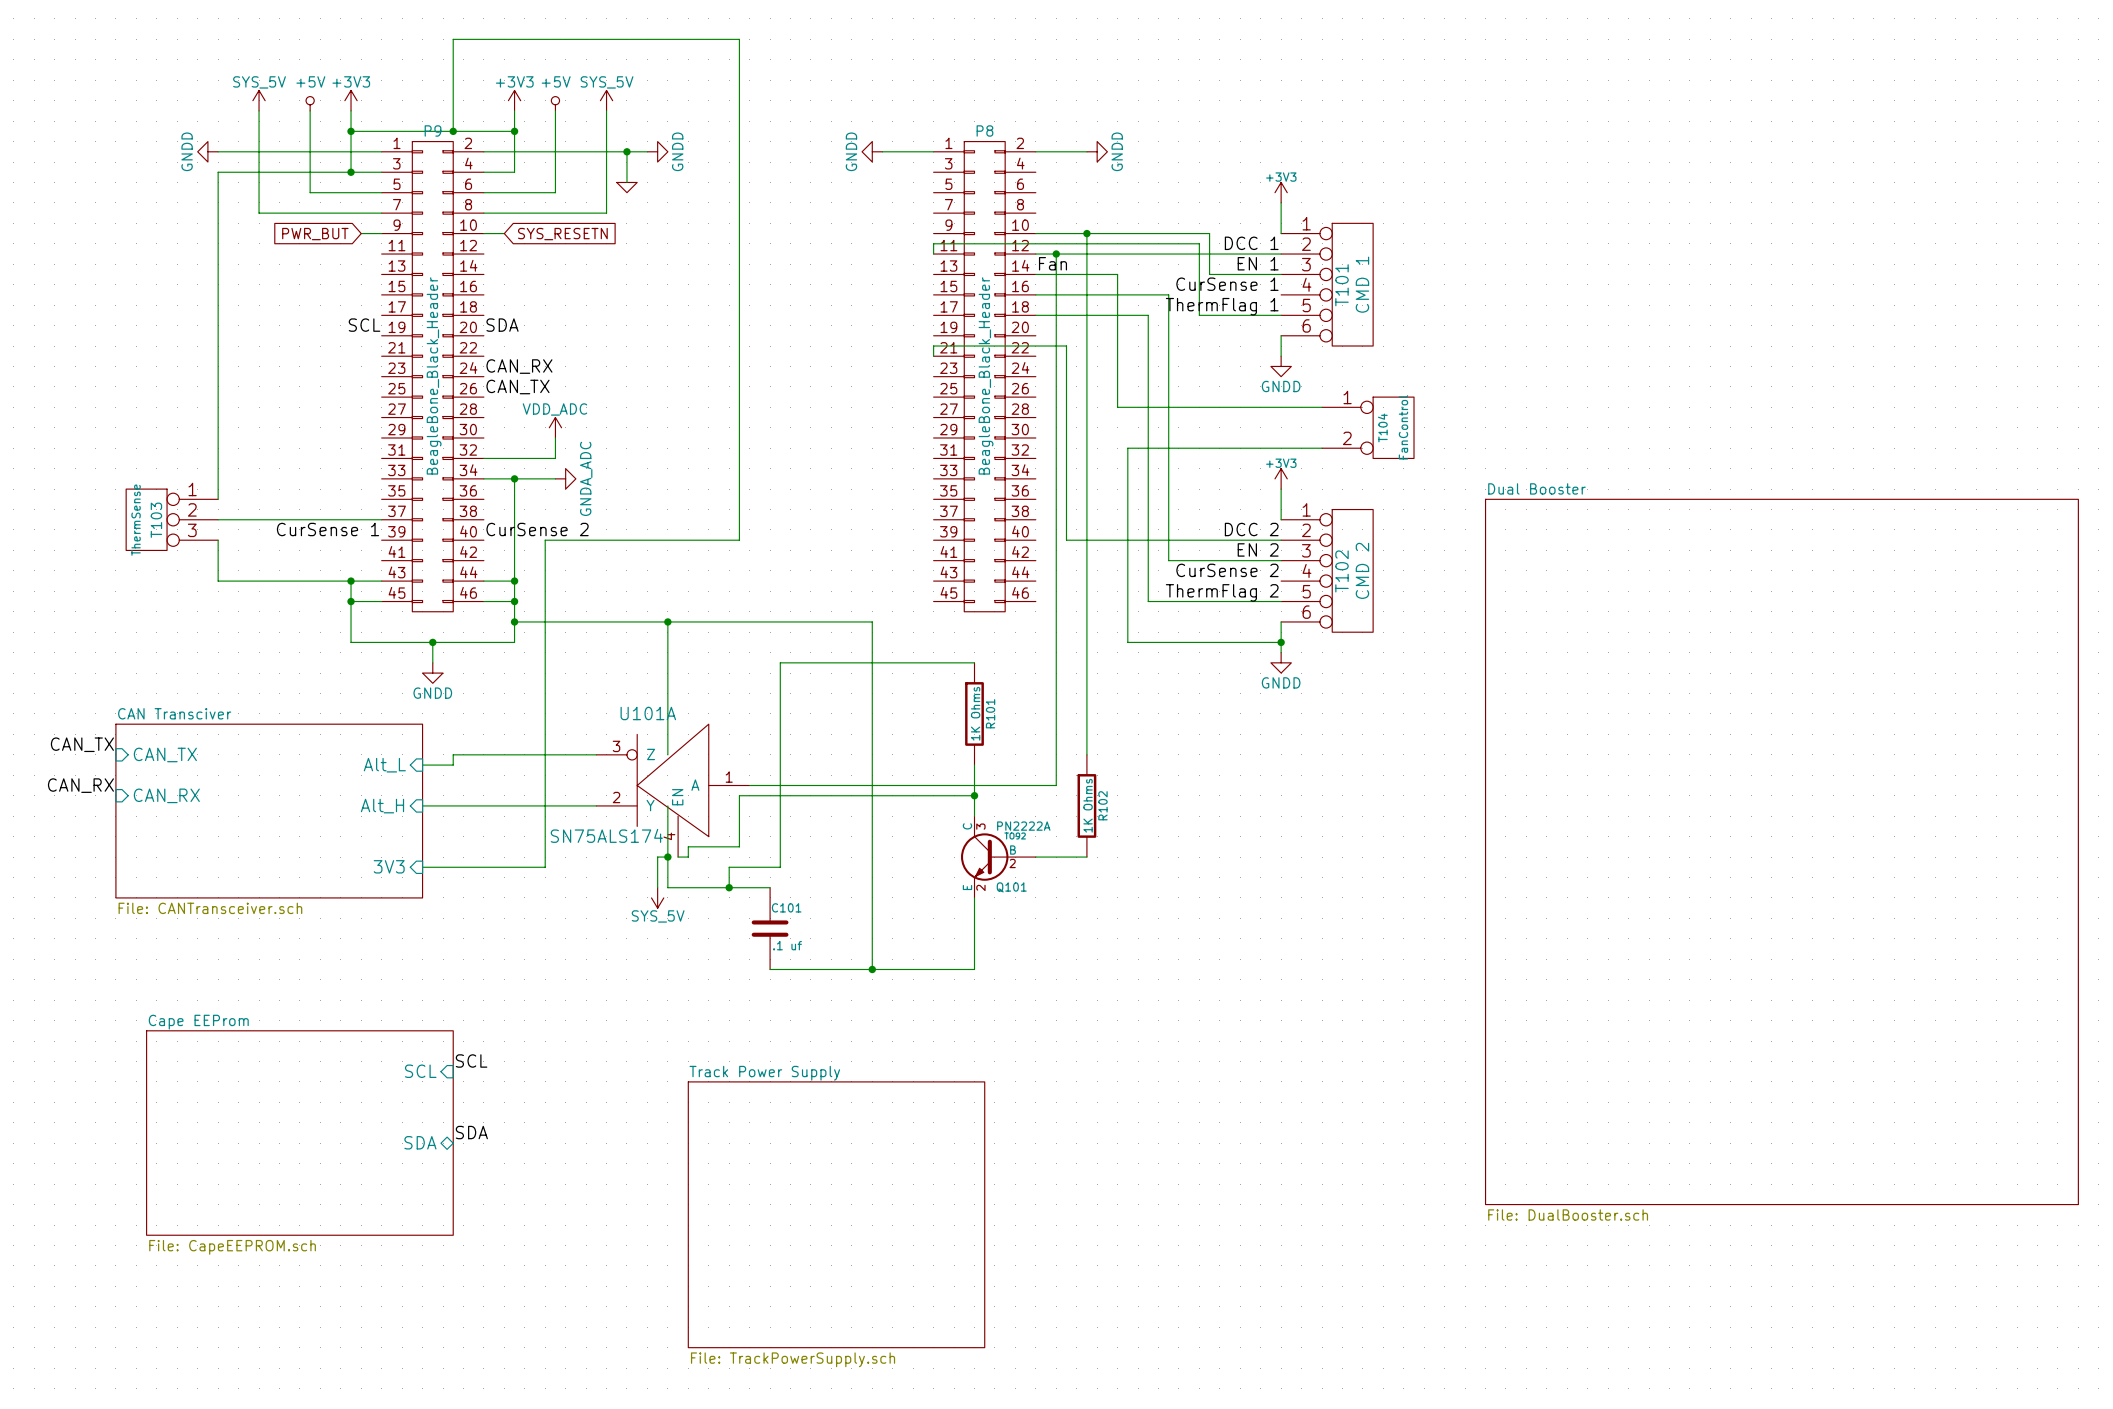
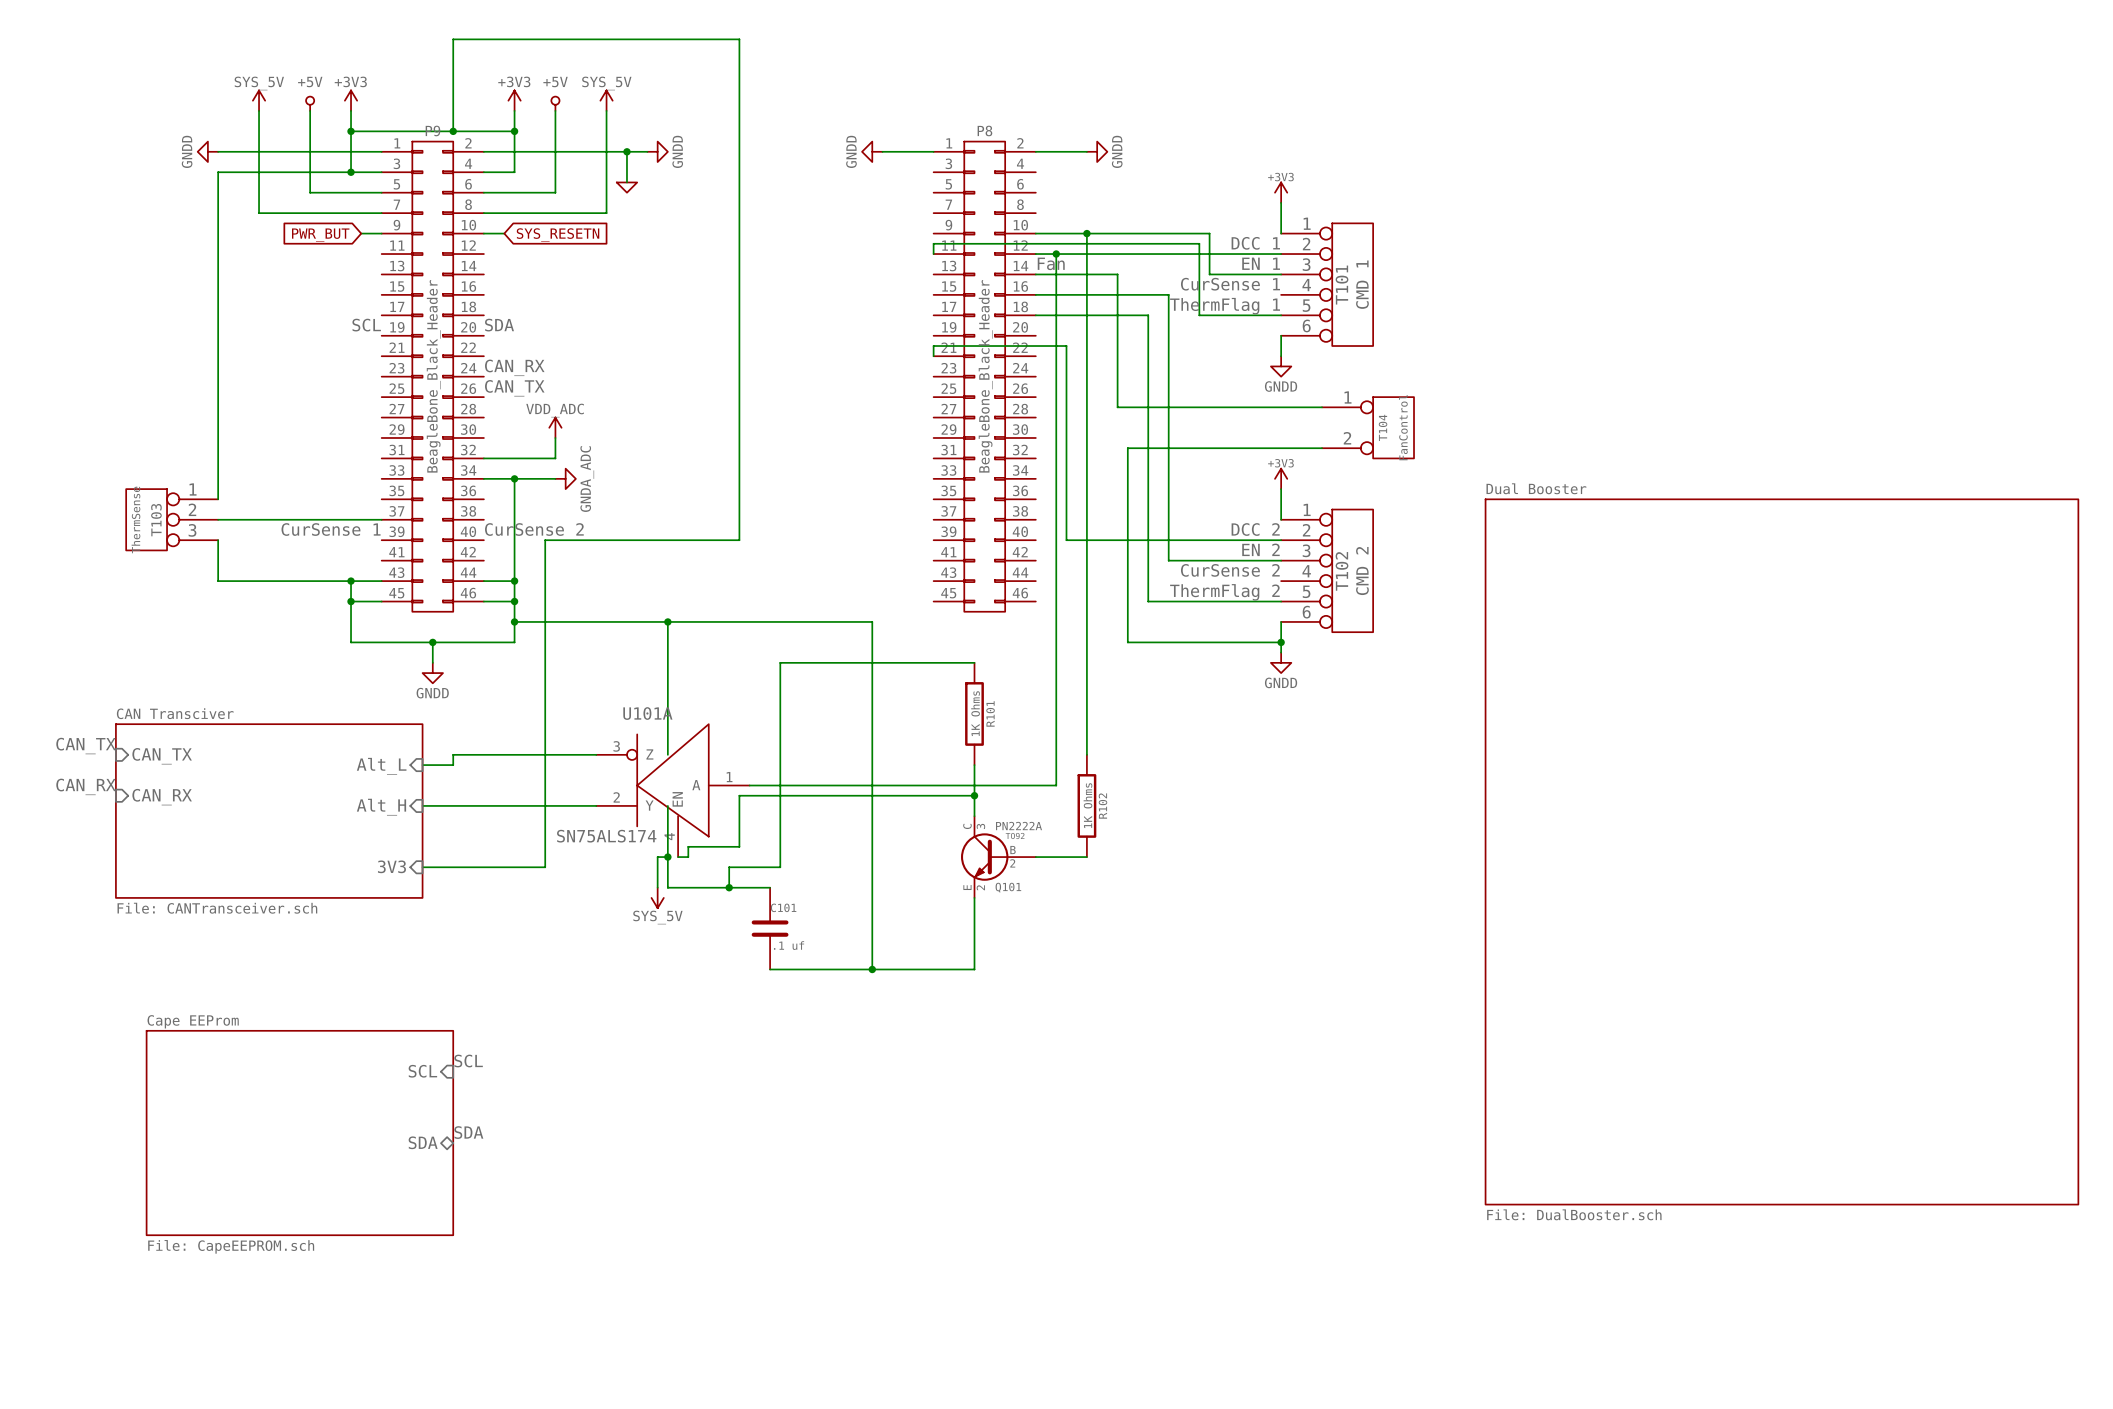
sheet Track Power Supply: File: TrackPowerSupply.sch (836, 1214) -> none

